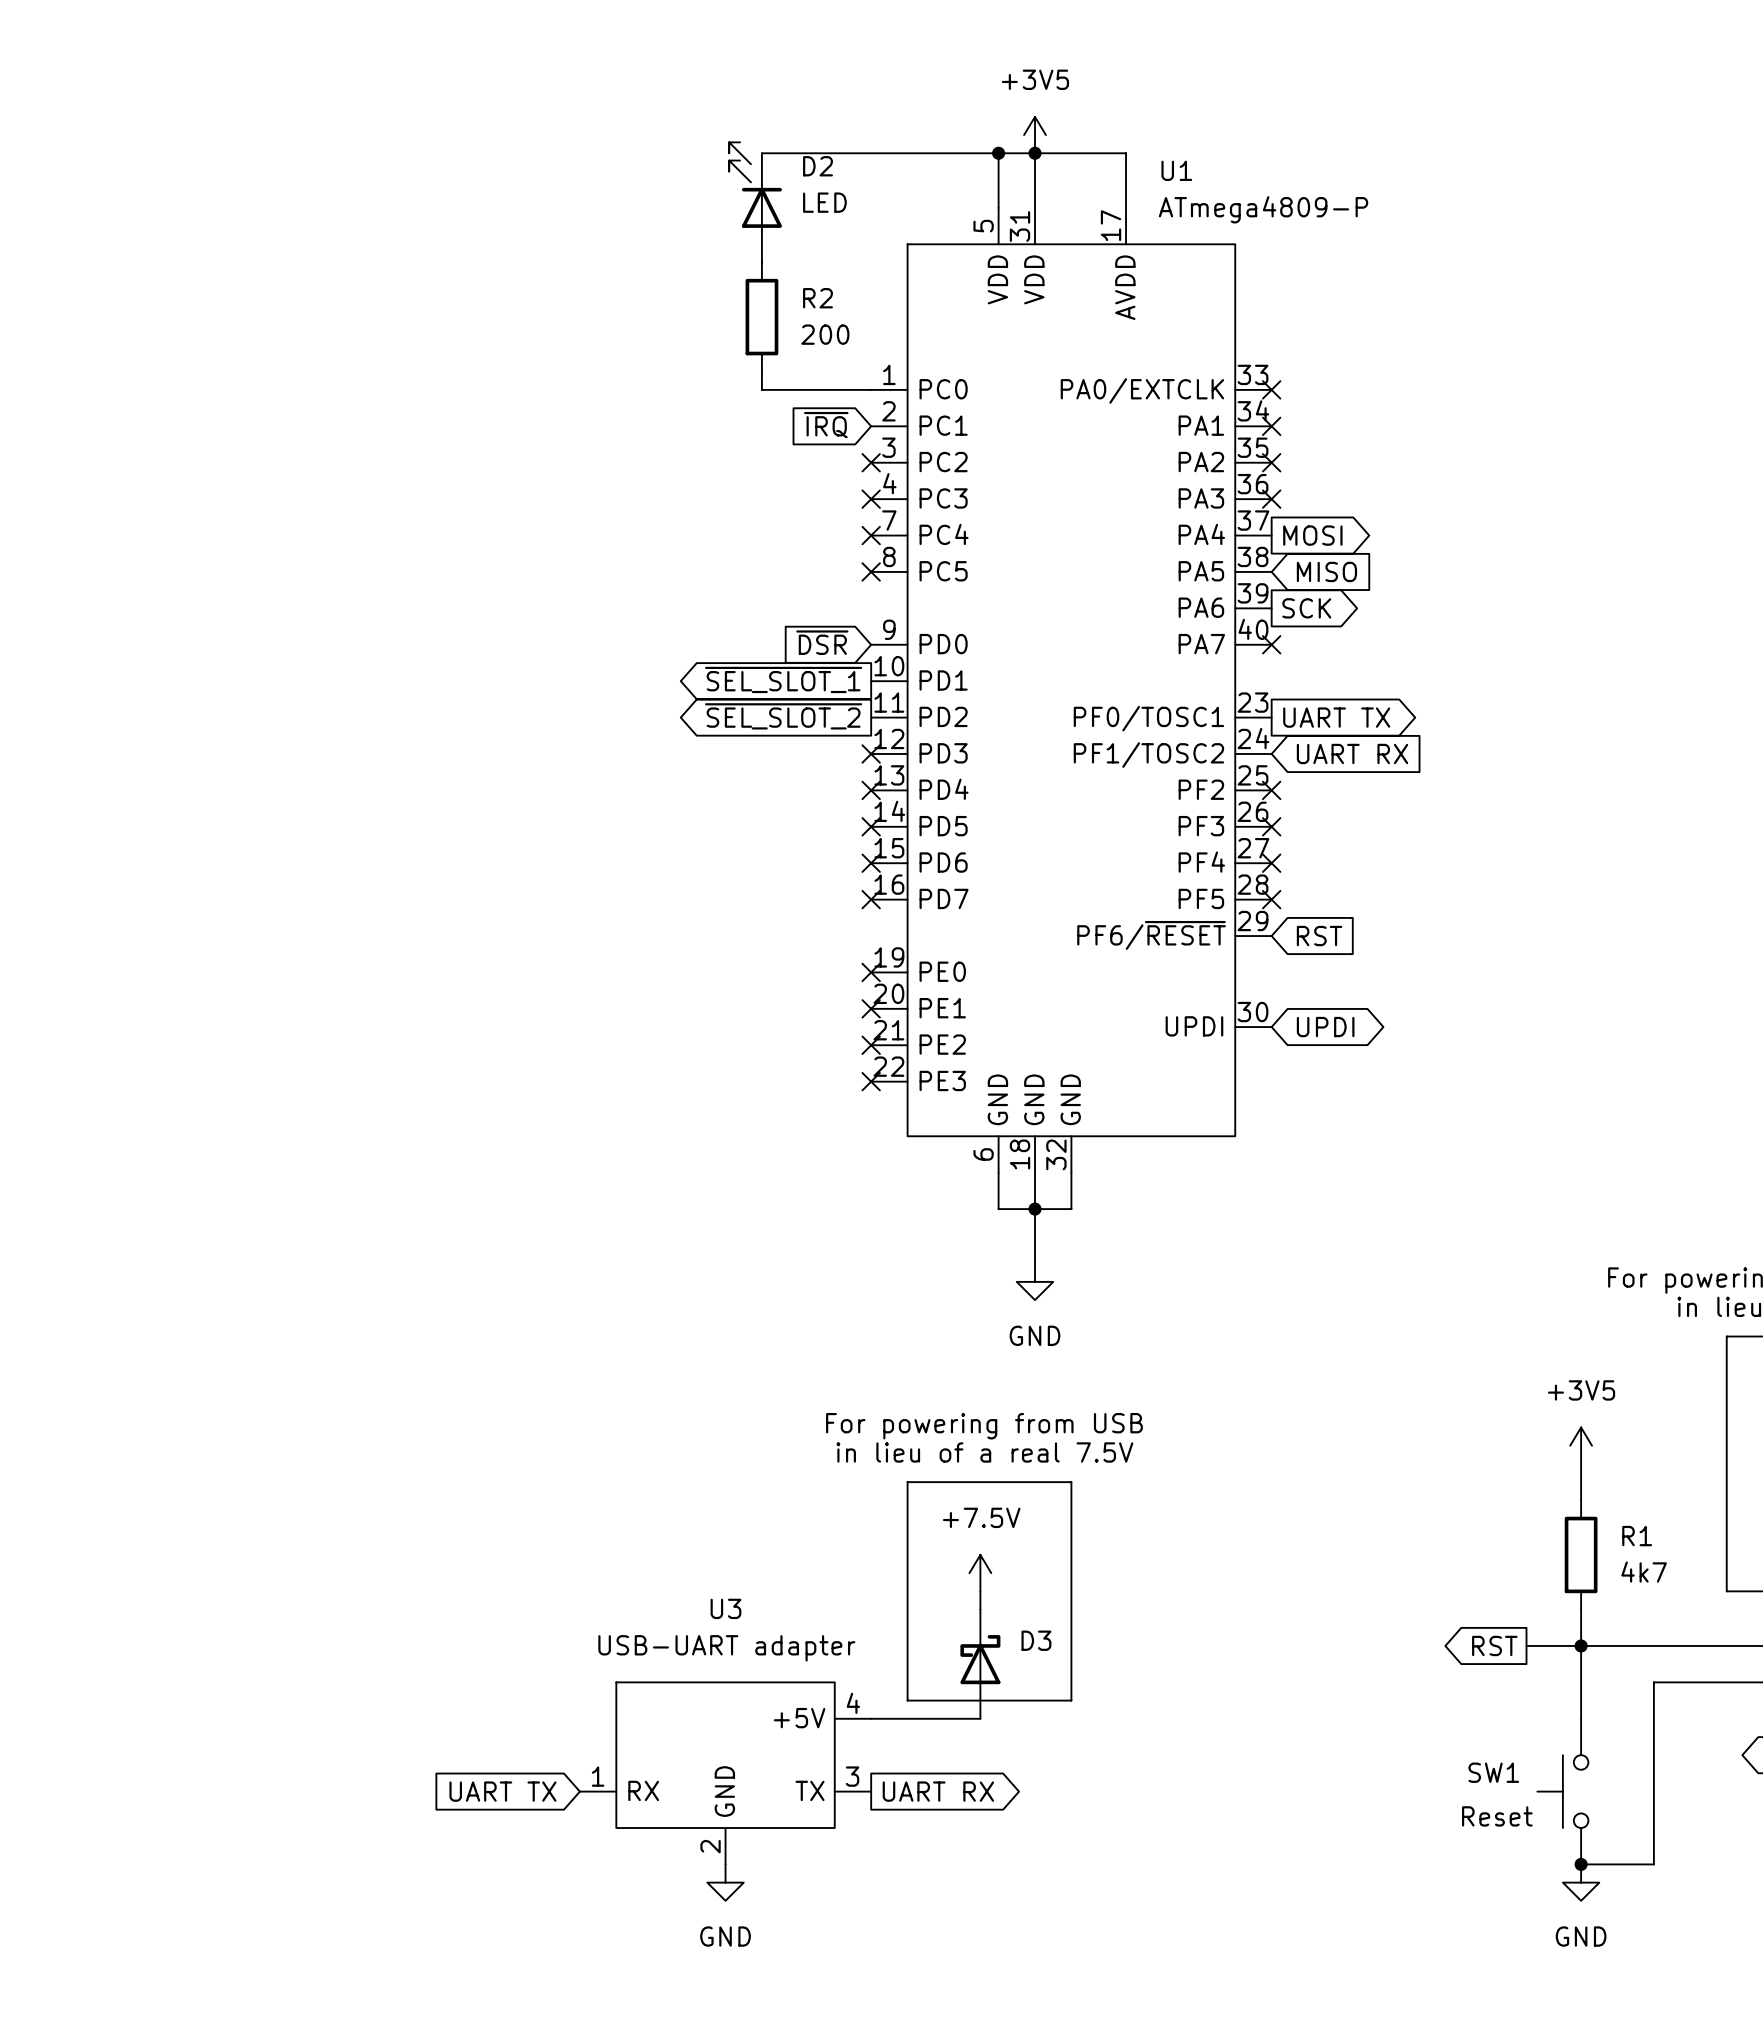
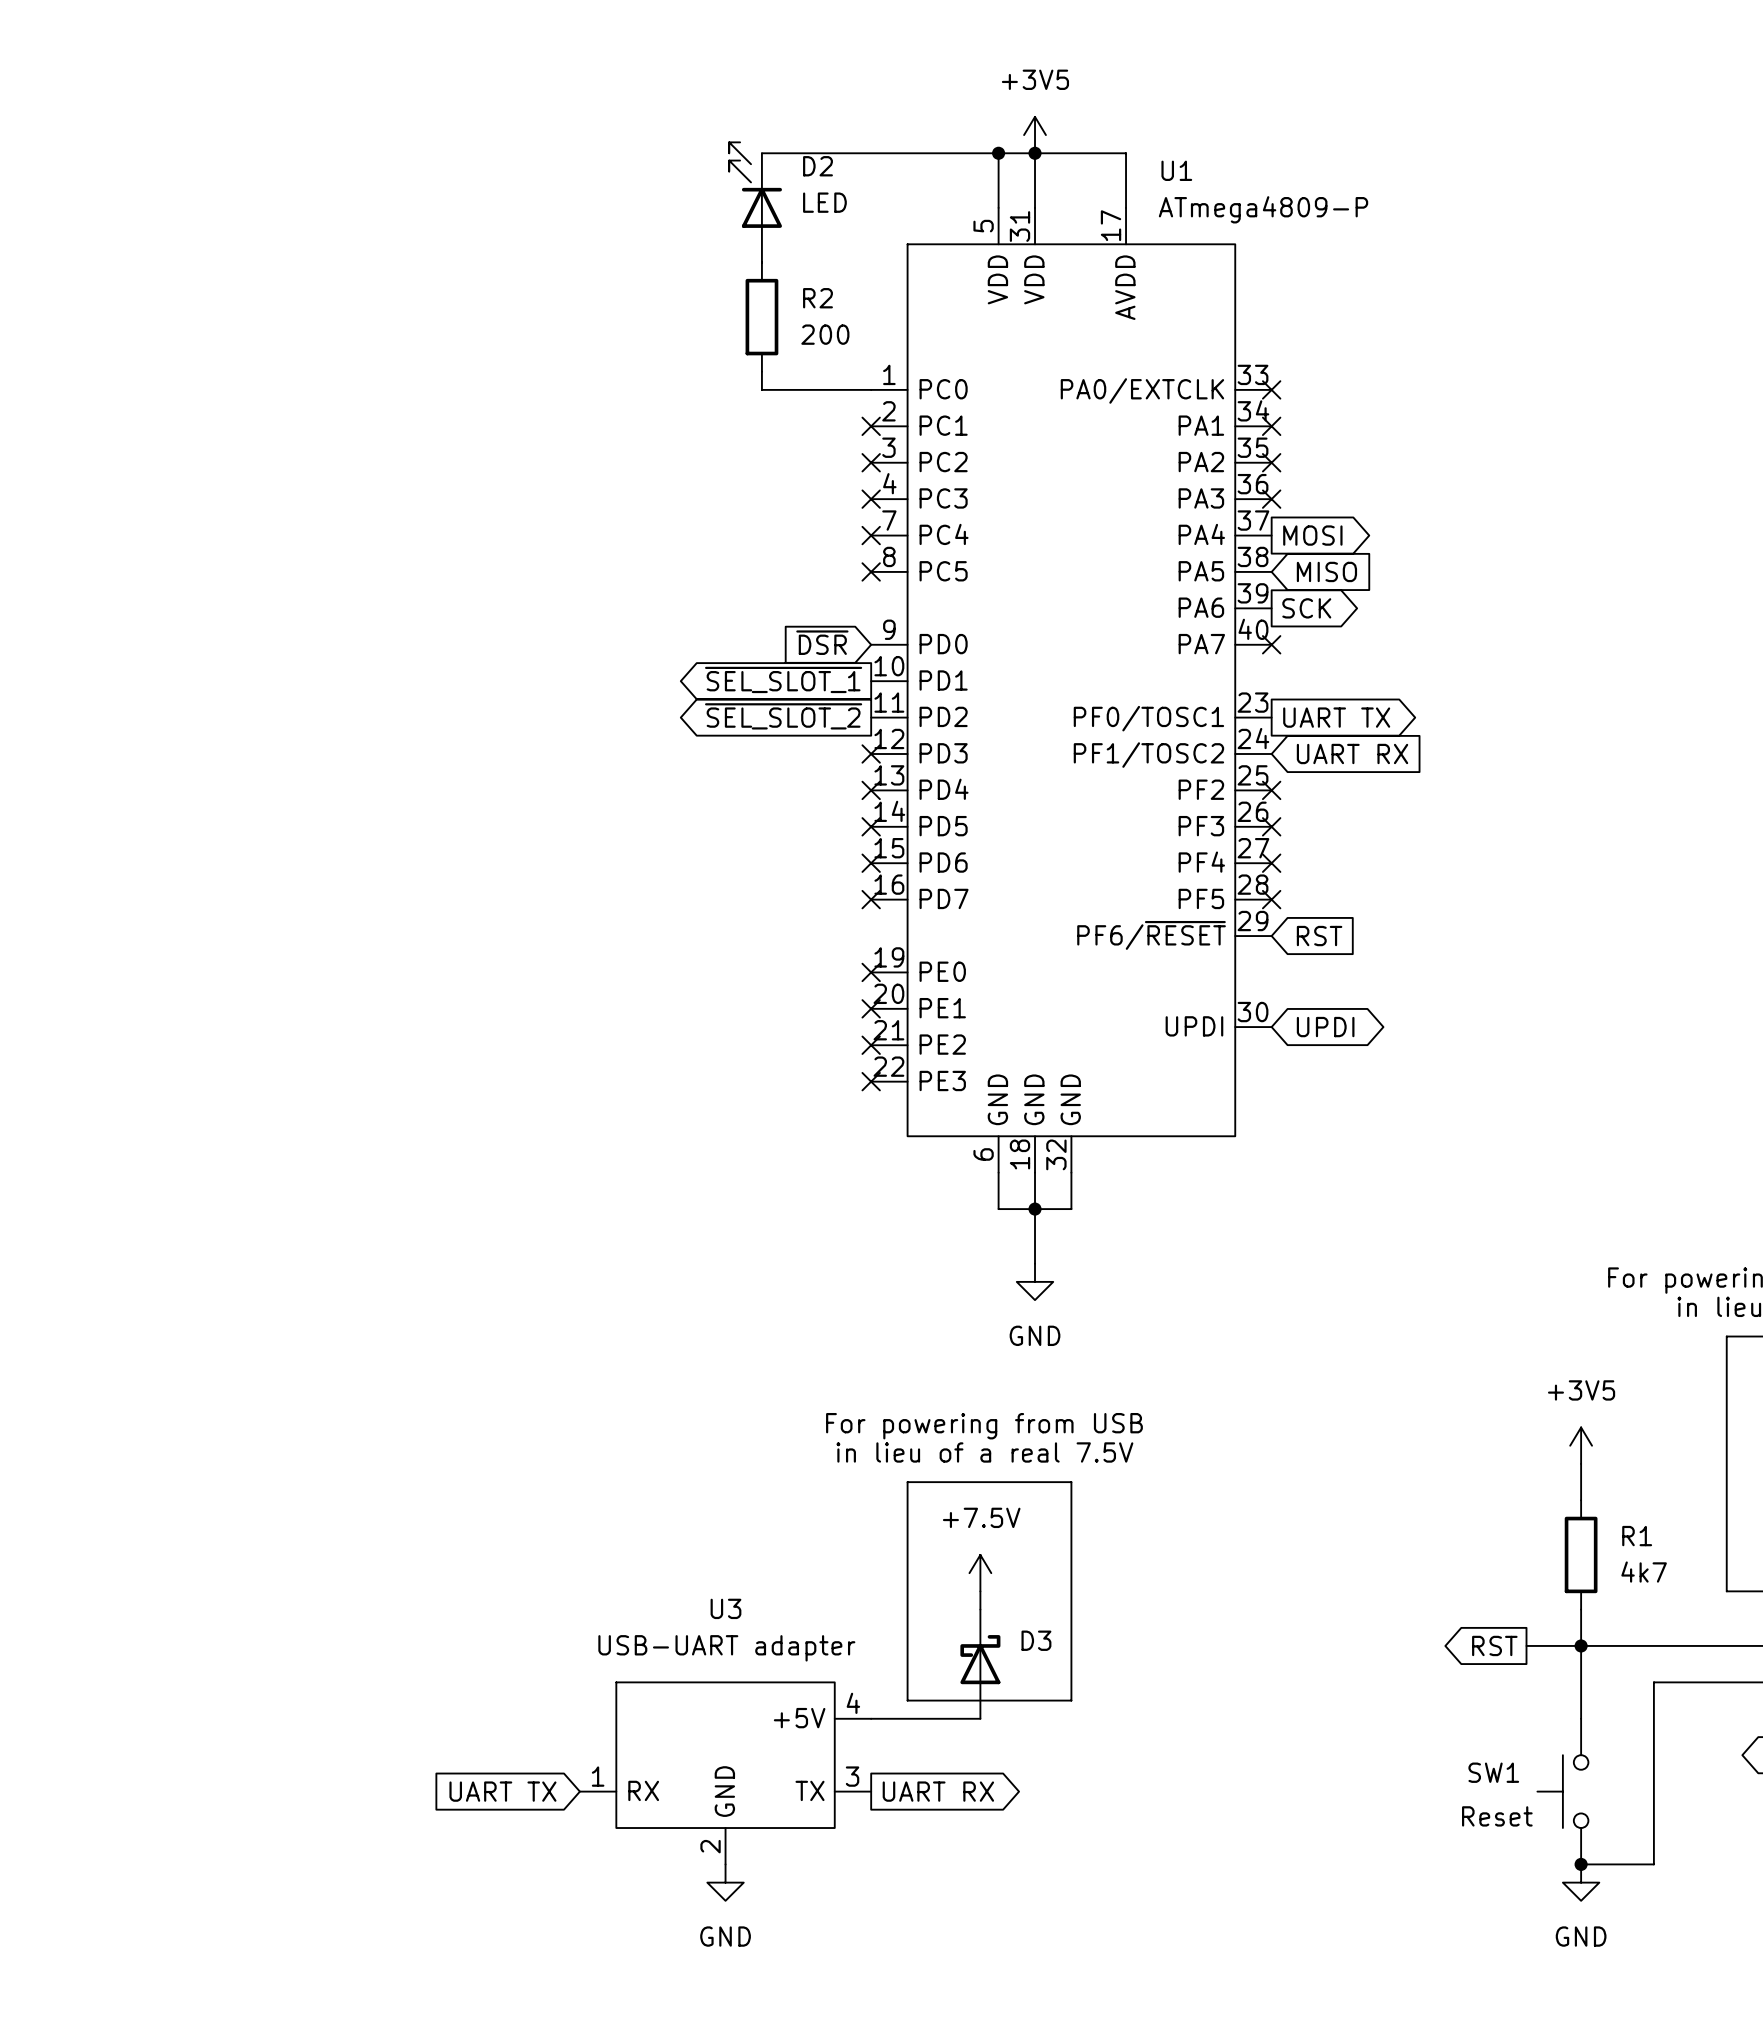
global label: ~{IRQ} (826, 425) -> none
no-connect mark: none -> (871, 426)

